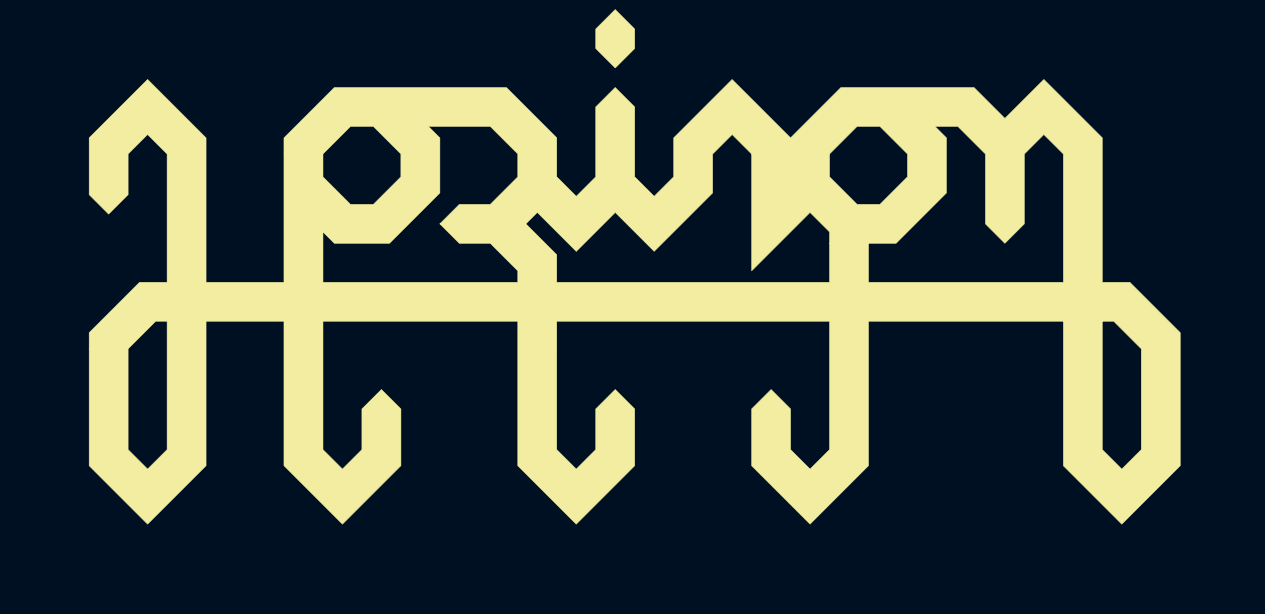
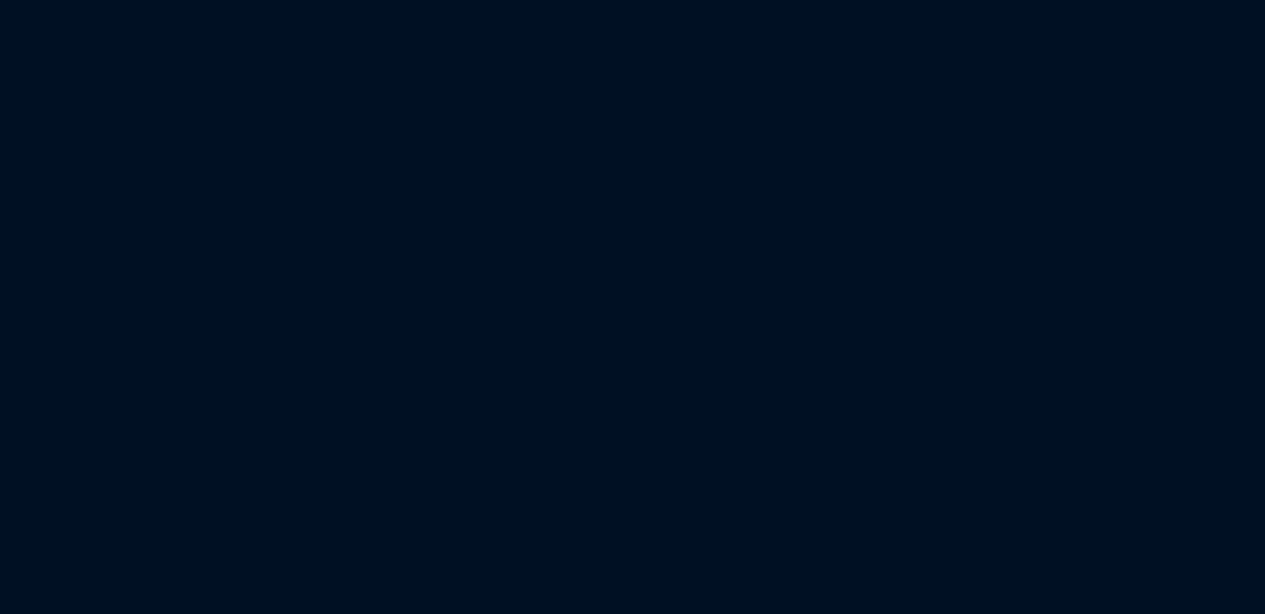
drawing: [88, 9, 1181, 525] -> none

